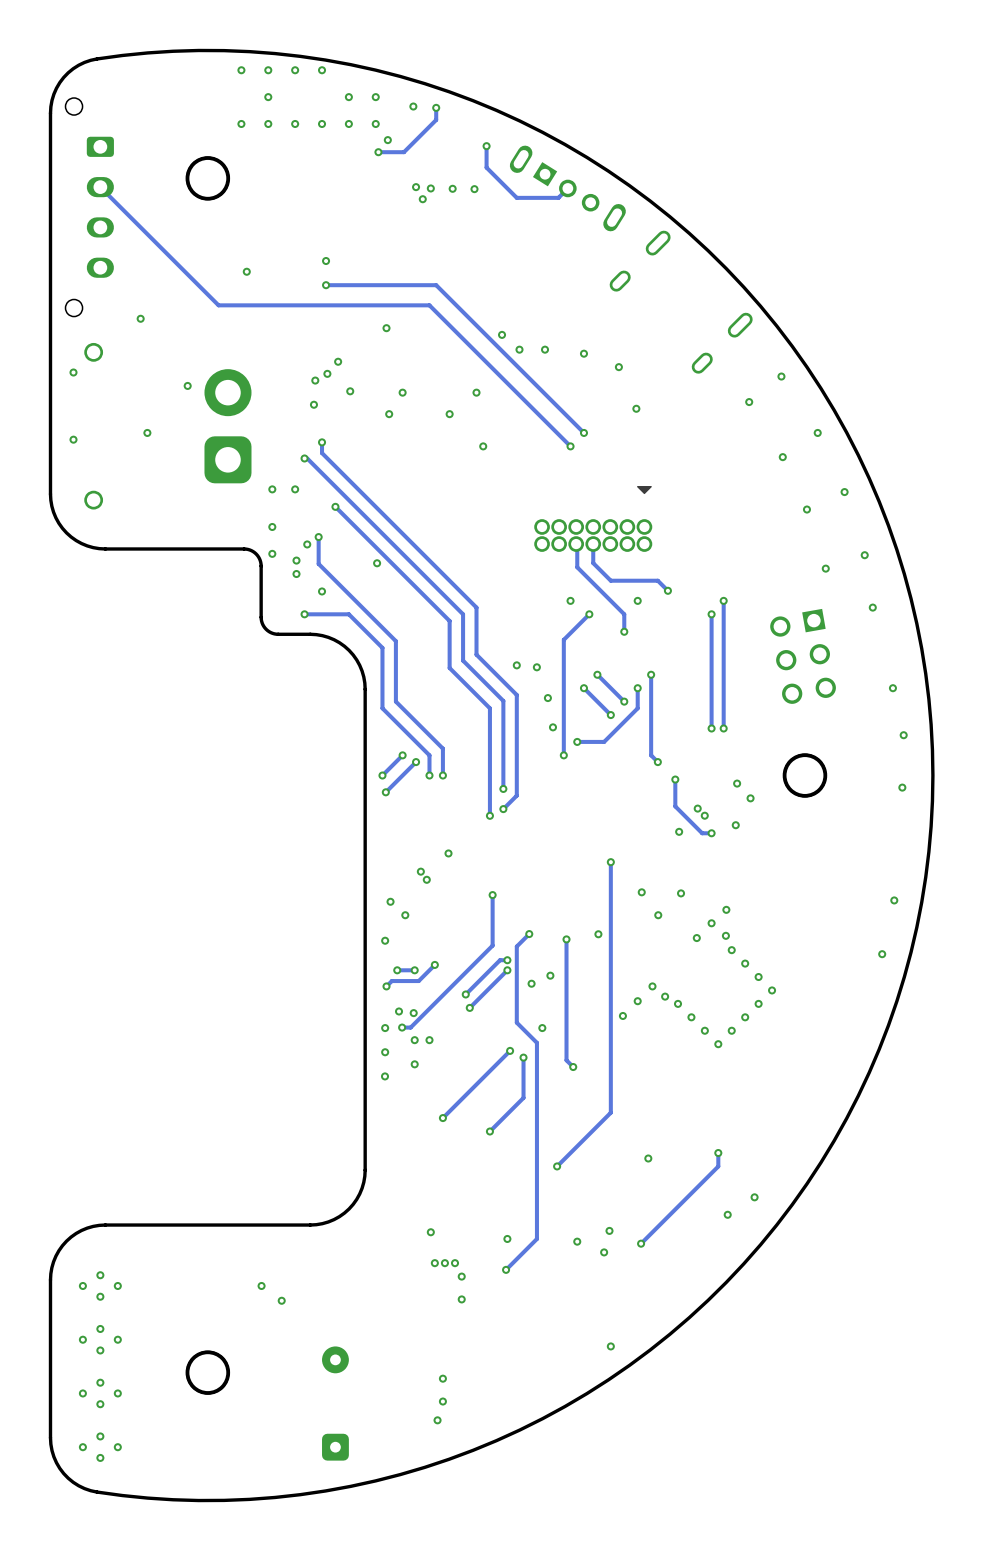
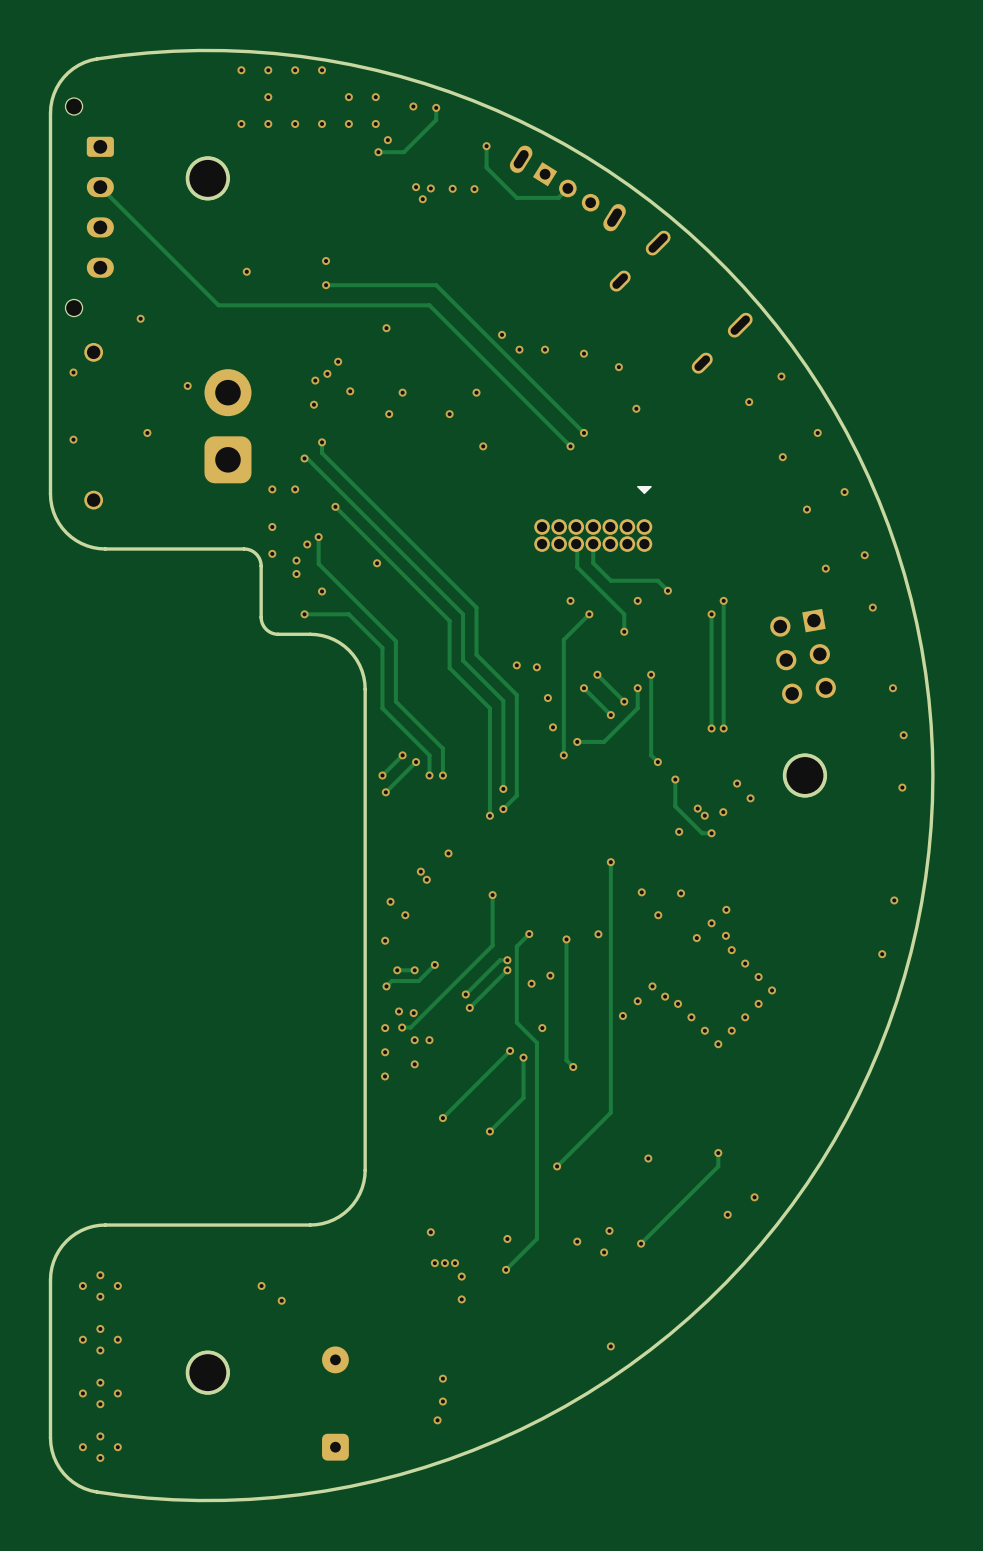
via position: (735, 825) -> (723, 812)

